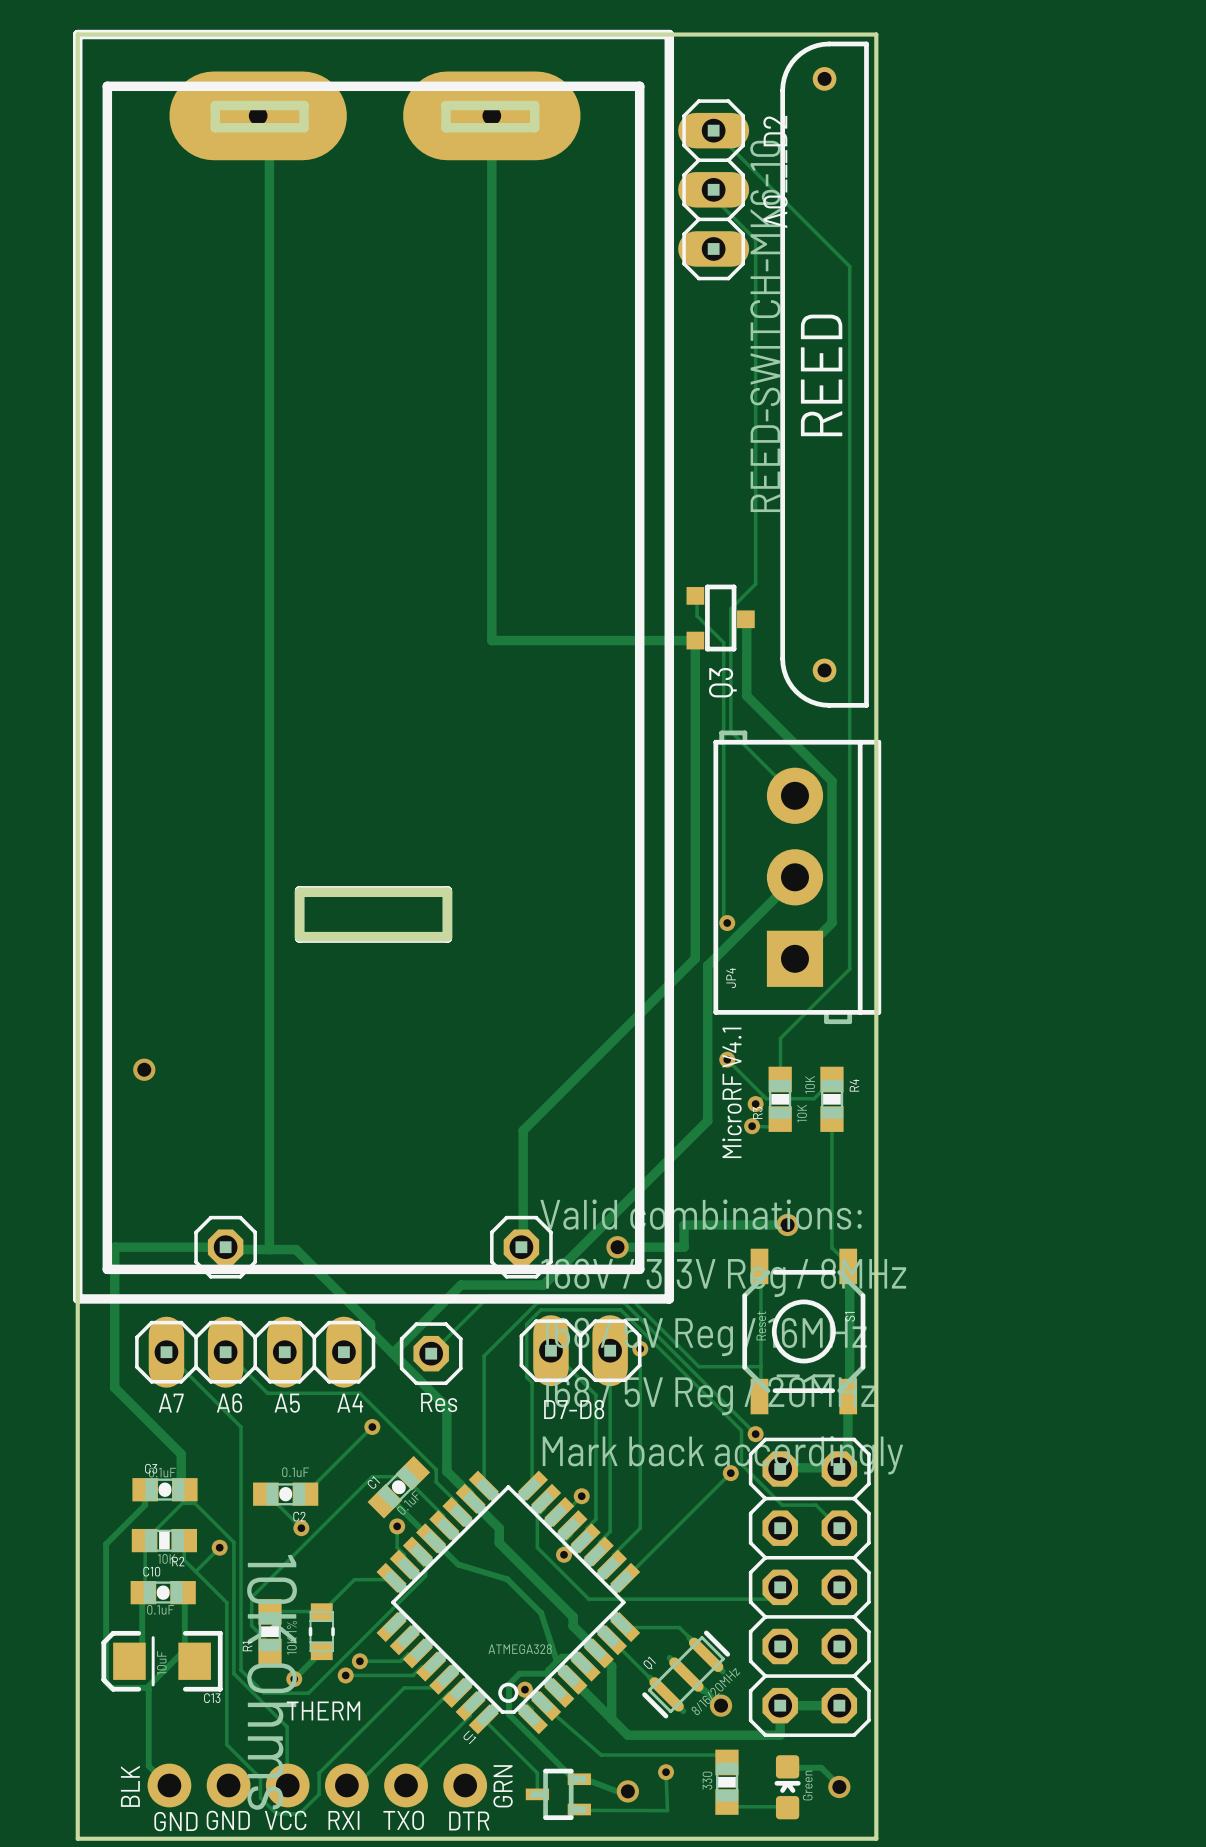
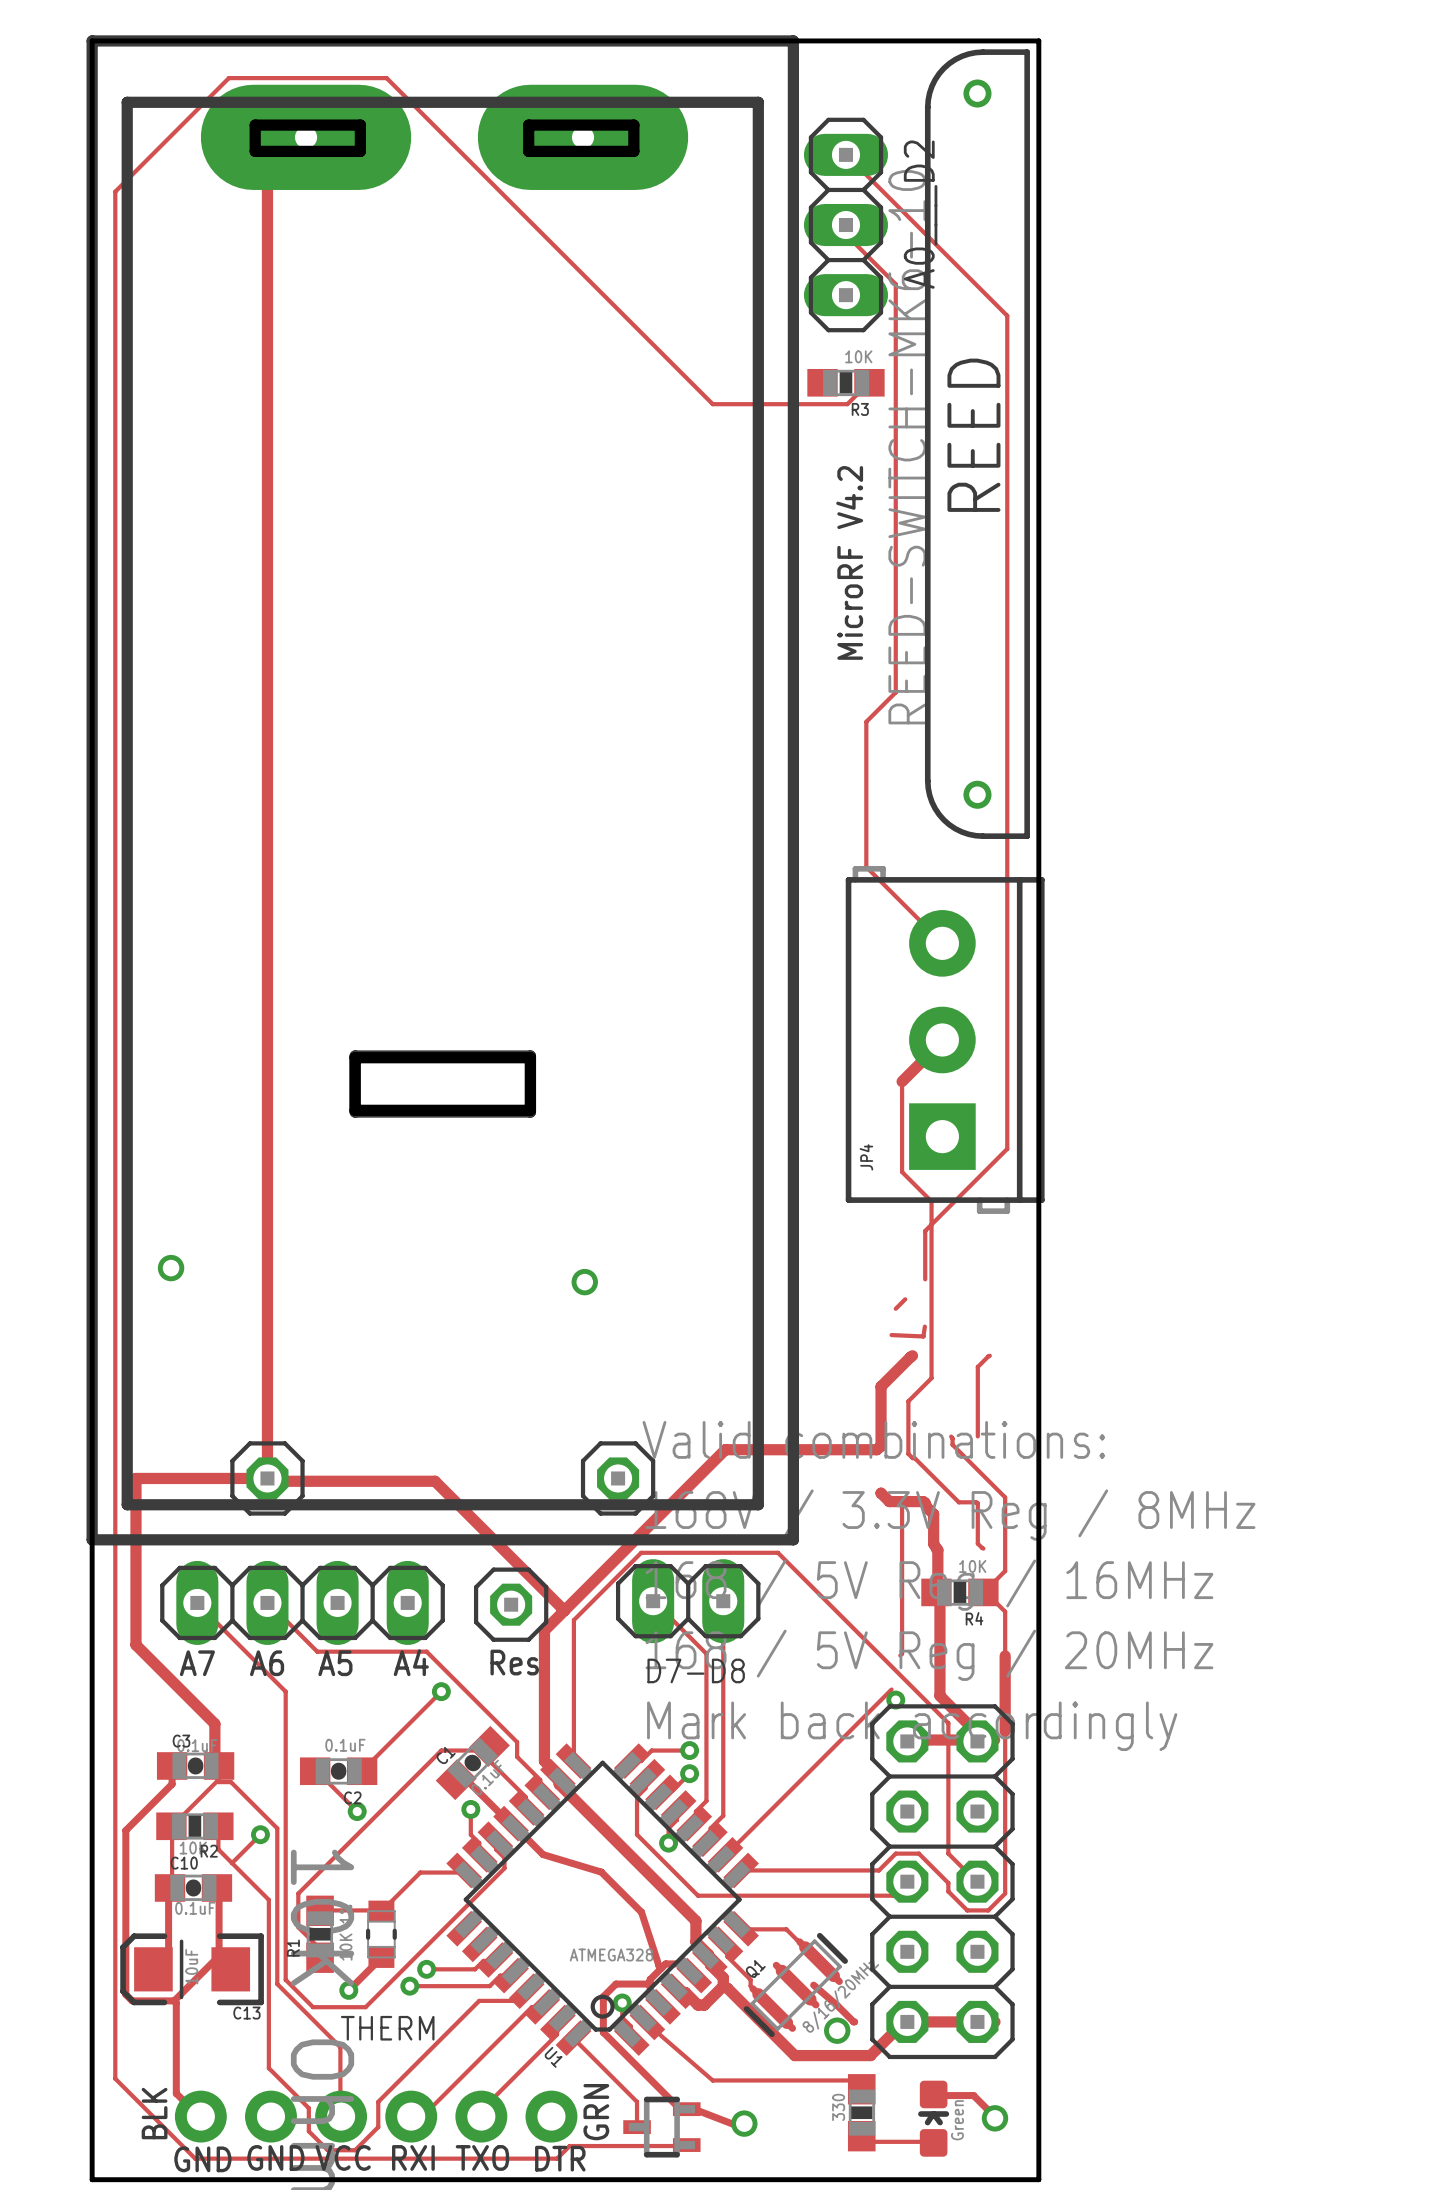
track: (258, 115) (269, 117) (269, 1249) -> (306, 137) (267, 137) (267, 1478)
track: (491, 115) (491, 640) (695, 640) -> none
text: none -> MicroRF V4.2 (849, 562)
track: (695, 595) (697, 596) (697, 616) (723, 642) (723, 919) (727, 923) -> none
Q3: (720, 618) -> none
track: (745, 619) (746, 695) (831, 781) (831, 923) (794, 958) -> none
track: (695, 640) (695, 958) (523, 1130) (523, 1242) (521, 1246) -> none
track: (760, 912) (707, 965) (707, 1120) (543, 1285) (461, 1285) (392, 1353) -> (902, 1081) (902, 1172) (931, 1201) (931, 1378) (908, 1401) (908, 1453) (958, 1502) (977, 1502) (977, 1543) (983, 1548)
via: (727, 923) -> none
track: (727, 1059) (766, 1098) (814, 1098) (831, 1079) -> none
via: (727, 1059) -> none
via: none -> (584, 1282)
text: MicroRF V4.1 (731, 1092) -> none
R3 rotation: 0° (780, 1099) -> 90° clockwise (845, 382)
R3 position: (780, 1099) -> (845, 382)
R4 rotation: 0° (831, 1099) -> 90° clockwise (959, 1592)
R4 position: (831, 1099) -> (959, 1592)
via: (755, 1104) -> none
track: (831, 1119) (831, 1247) (849, 1267) (848, 1396) -> (951, 1436) (952, 1444) (1005, 1497) (1005, 1571) (983, 1592) (986, 1592) (1005, 1611) (1005, 1655)
via: (752, 1126) -> none
track: none -> (912, 1355) (881, 1386) (881, 1446) (876, 1449) (725, 1449) (544, 1630) (544, 1761) (557, 1776)
track: none -> (989, 1355) (977, 1366) (977, 1436)
track: (787, 1225) (684, 1225) (684, 1247) (617, 1247) -> none
via: (787, 1225) -> none
via: (617, 1247) -> none
track: (296, 1249) (370, 1324) (370, 1331) (446, 1407) (446, 1471) (469, 1494) (470, 1498) (469, 1489) -> (350, 1481) (435, 1481) (564, 1610)
track: none -> (881, 1493) (889, 1501) (923, 1501) (933, 1514) (933, 1543) (937, 1549) (936, 1592) (939, 1596) (939, 1695) (975, 1731) (977, 1741)
track: (620, 1309) (741, 1430) (741, 1464) (782, 1505) (815, 1505) (839, 1528) -> (735, 1552) (777, 1552) (948, 1723) (948, 1853) (977, 1881)
track: (526, 1324) (526, 1377) (532, 1382) (532, 1485) -> (624, 1569) (573, 1620)
S1: Reset (803, 1331) -> none
track: (640, 1348) (640, 1528) (613, 1554) (613, 1563) -> (891, 1689) (727, 1853)
via: (640, 1348) -> none
track: (431, 1353) (489, 1295) (627, 1295) (698, 1366) (760, 1366) -> none
track: (484, 1366) (484, 1356) (537, 1302) (624, 1302) (755, 1434) -> none
track: (730, 1473) (626, 1577) -> (1005, 1731) (1005, 1893) (988, 1910) (967, 1910) (948, 1891) (948, 1883) (918, 1853) (895, 1853) (878, 1870) (742, 1870)
via: (730, 1473) -> none
track: none -> (689, 1750) (651, 1750) (641, 1761) (631, 1761)
via: none -> (689, 1750)
track: (471, 1500) (499, 1528) (499, 1542) (573, 1616) (573, 1626) (611, 1666) (611, 1718) -> (559, 1778) (559, 1784) (695, 1920) (695, 1941) (708, 1954) (710, 1965) (723, 1977) (723, 1986)
part position: (809, 1587) -> (942, 1881)
track: (663, 1627) (679, 1627) (689, 1638) -> (786, 1929) (799, 1941)
track: (613, 1641) (649, 1677) -> (727, 1946) (727, 1956) (750, 1979) (750, 1986) (752, 1988)
Q1 position: (686, 1674) -> (795, 1985)
track: none -> (723, 1986) (704, 2005) (698, 2005) (685, 1992) (678, 1991)
track: (572, 1679) (627, 1735) (780, 1735) (780, 1705) -> (723, 1986) (794, 2055) (870, 2055) (902, 2024) (907, 2021) (924, 2021)
via position: (721, 1705) -> (837, 2030)
track: (666, 1772) (667, 1810) (578, 1810) -> (869, 382) (847, 404) (712, 404) (386, 78) (228, 78) (115, 191) (115, 2078) (195, 2158) (557, 2158) (569, 2146) (685, 2146)
via: (666, 1772) -> none

